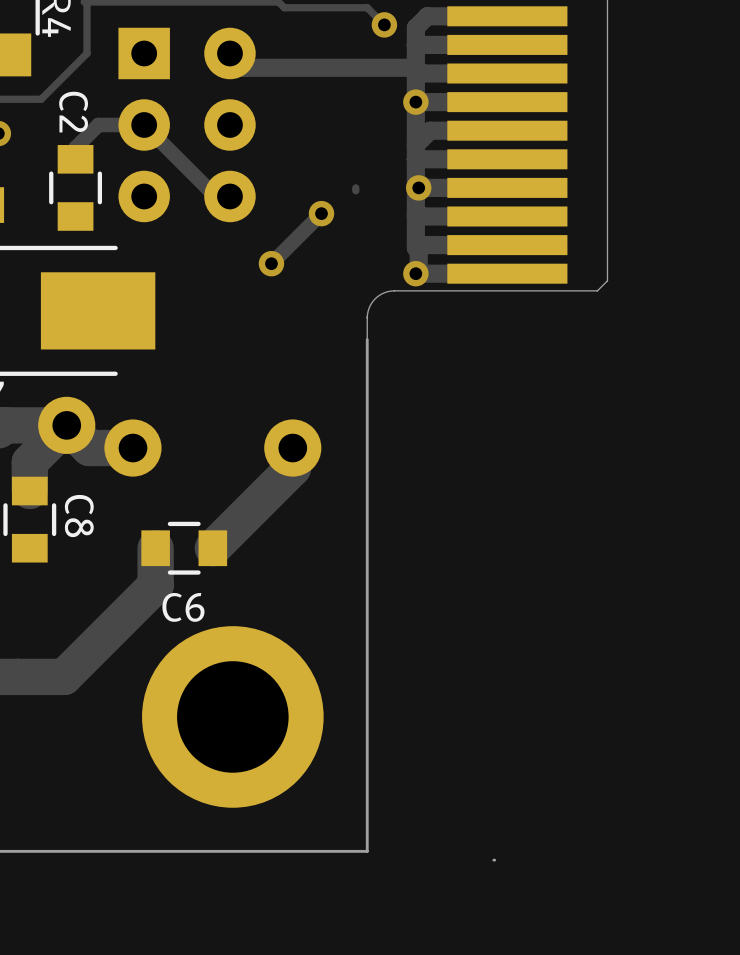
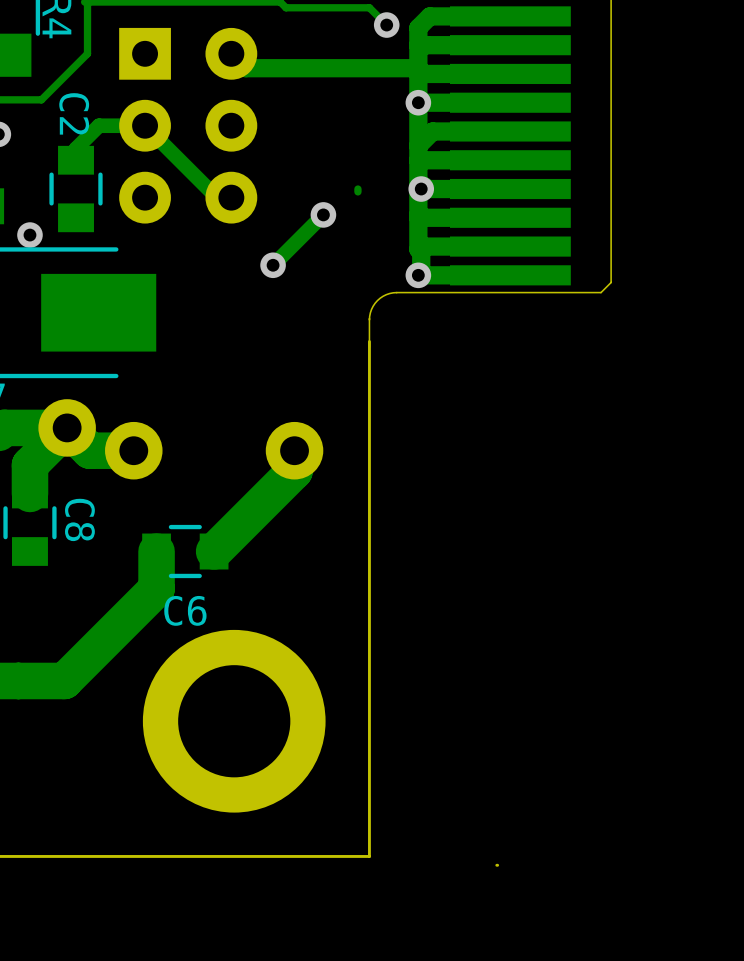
via: none -> (29, 235)

